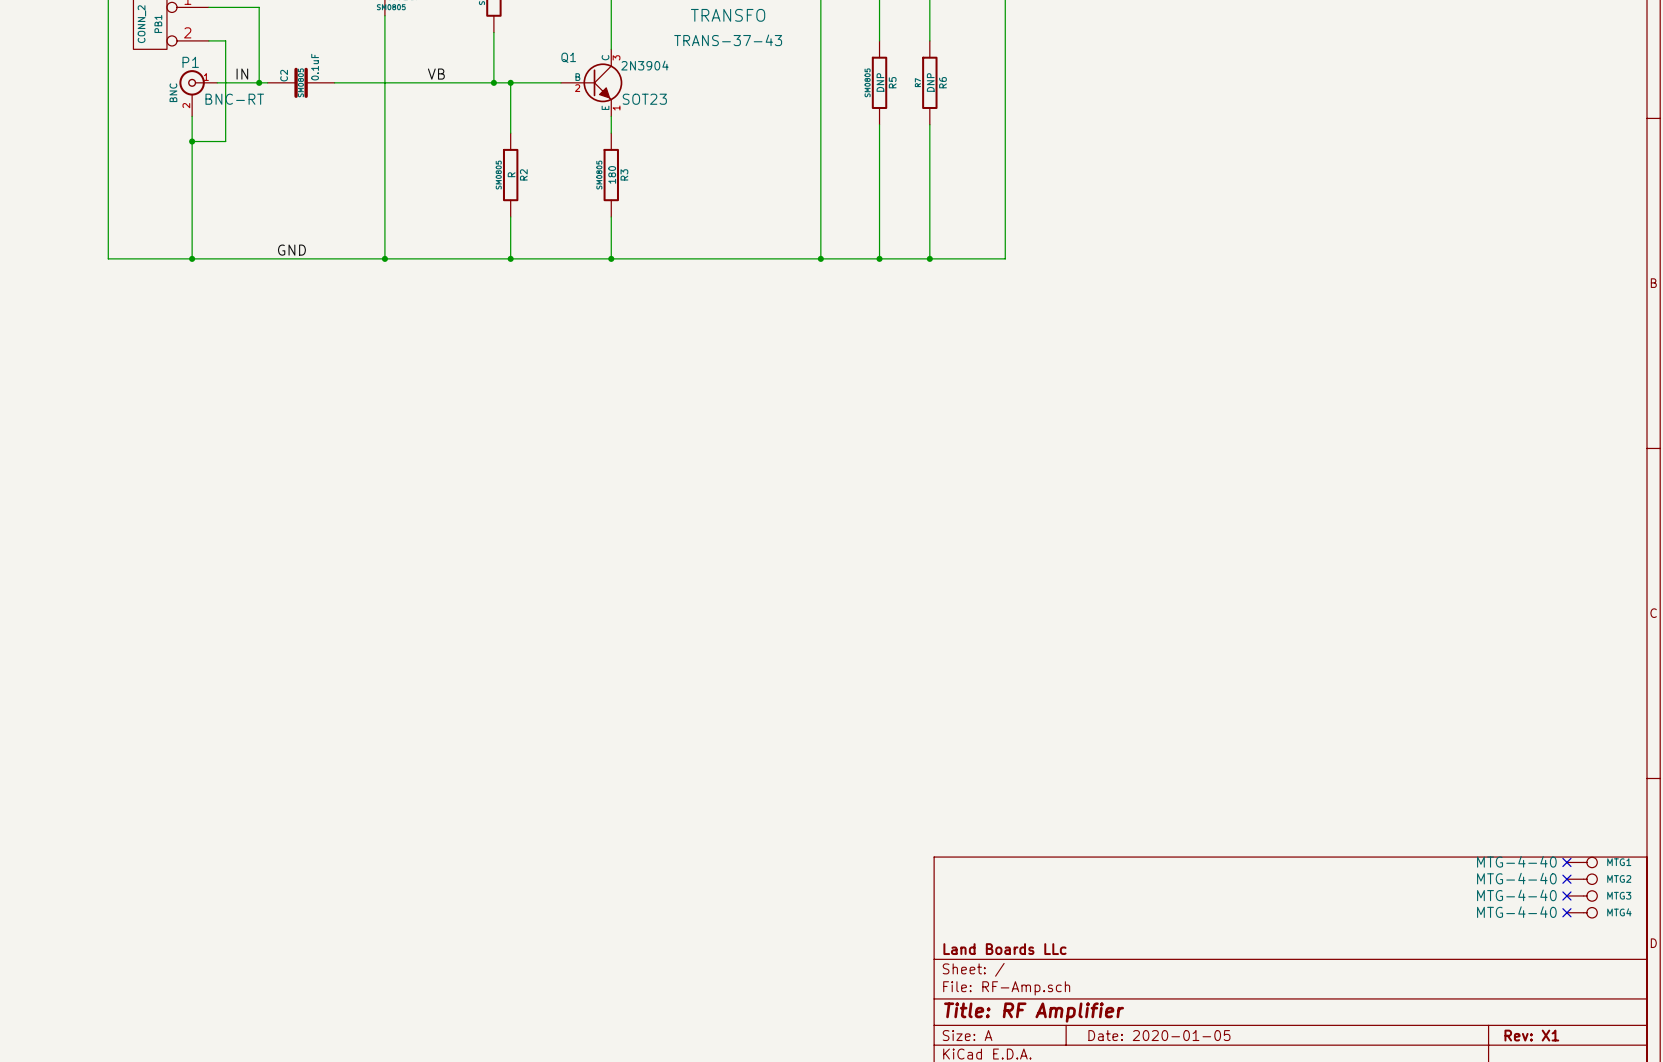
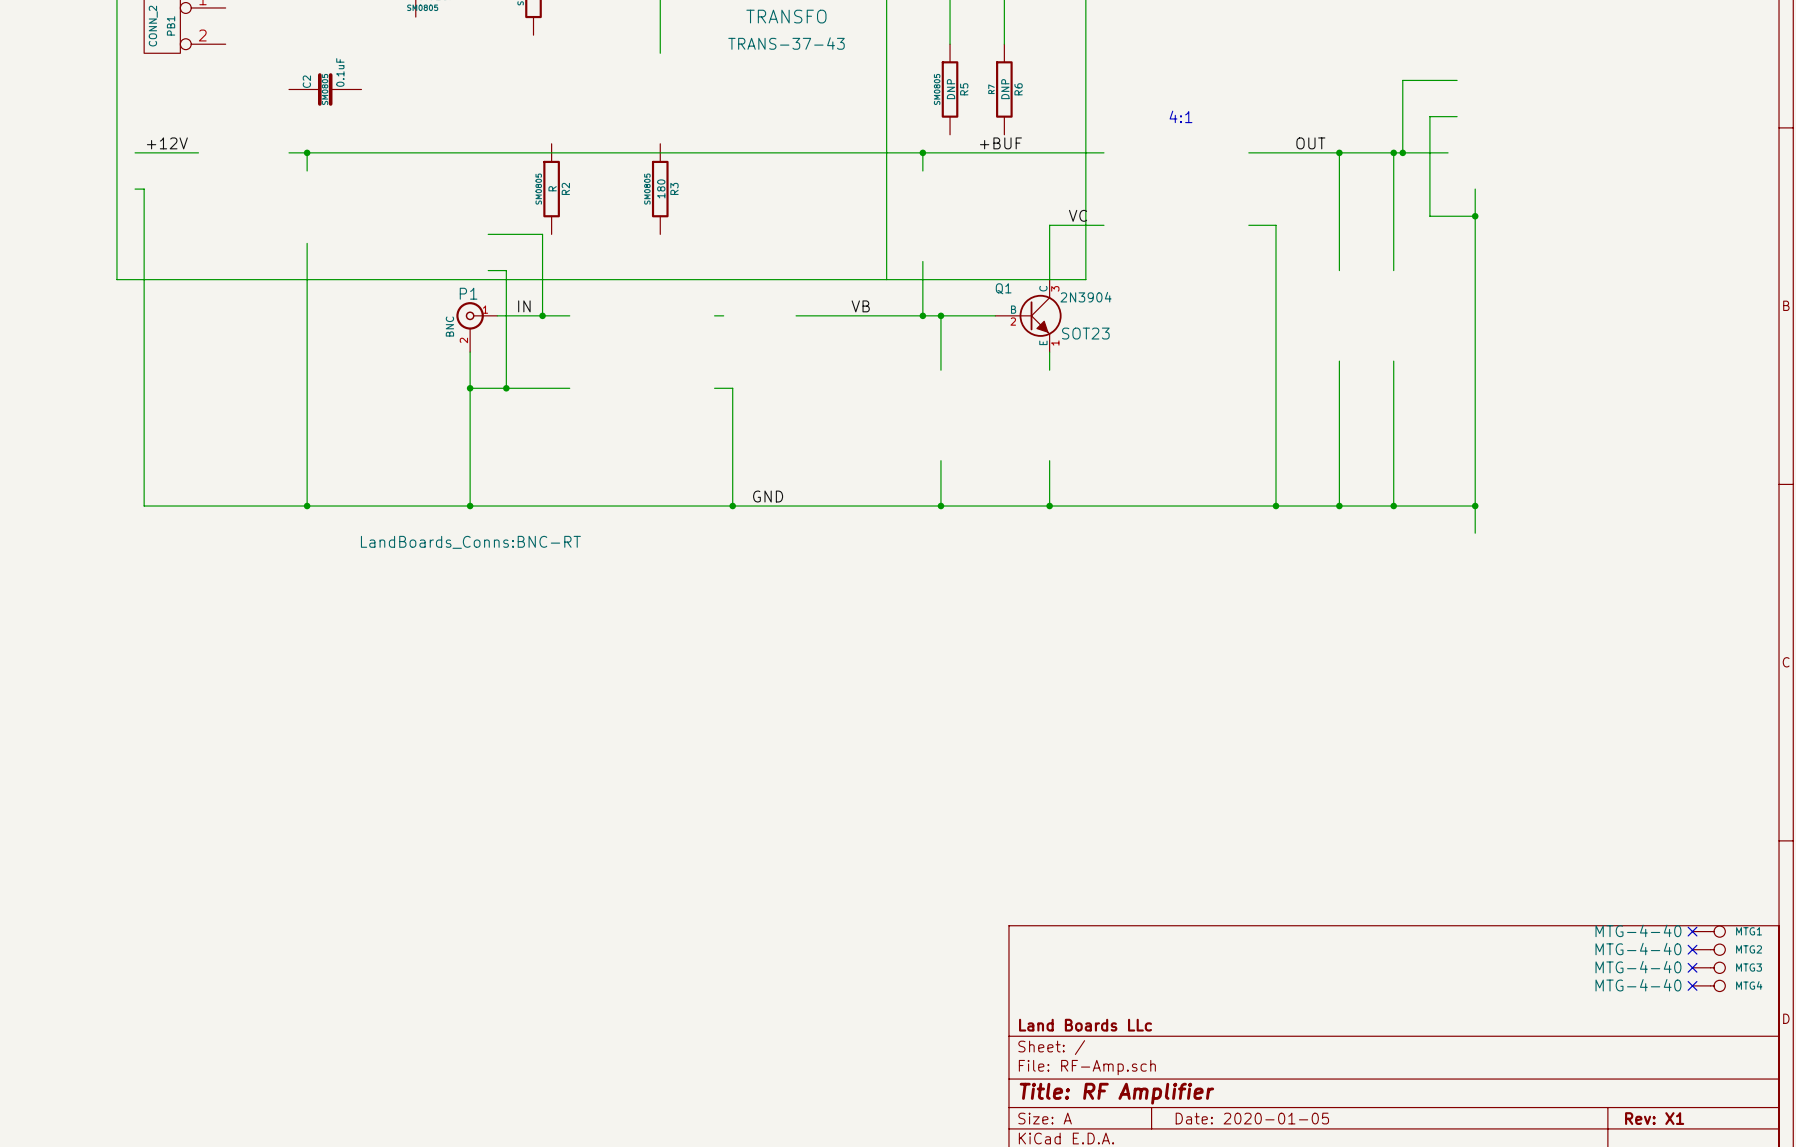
wire: (208, 7) (259, 7) (259, 82) -> none
wire: (384, 15) (384, 258) -> none
wire: (493, 32) (493, 82) -> none
wire: (208, 40) (225, 40) (225, 141) (192, 141) -> none
label: IN (242, 74) -> none
label: VB (436, 74) -> none
wire: none -> (1457, 80) (1402, 80) (1402, 152)
wire: (217, 82) (267, 82) -> none
junction: (259, 82) -> none
wire: (334, 82) (560, 82) -> none
junction: (493, 82) -> none
wire: (510, 82) (510, 133) -> none
junction: (510, 82) -> none
Q1 position: (591, 82) -> (1028, 315)
P1 position: (198, 93) -> (476, 327)
P1 text: BNC-RT (234, 99) -> LandBoards_Conns:BNC-RT (470, 542)
wire: none -> (1457, 116) (1429, 116) (1429, 216) (1475, 216)
text: none -> 4:1 (1180, 116)
wire: (192, 116) (192, 258) -> none
wire: (611, 116) (611, 133) -> none
wire: (879, 124) (879, 258) -> none
wire: (929, 124) (929, 258) -> none
label: none -> +12V (167, 143)
label: none -> +BUF (1000, 143)
label: none -> OUT (1310, 143)
wire: none -> (135, 152) (198, 152)
junction: (192, 141) -> none
wire: none -> (289, 152) (1103, 152)
wire: none -> (307, 152) (307, 170)
junction: none -> (307, 152)
wire: none -> (922, 152) (922, 170)
junction: none -> (922, 152)
wire: none -> (1248, 152) (1448, 152)
wire: none -> (1339, 152) (1339, 270)
junction: none -> (1339, 152)
wire: none -> (1393, 152) (1393, 270)
junction: none -> (1393, 152)
junction: none -> (1402, 152)
wire: none -> (135, 189) (144, 189) (144, 506) (1475, 506)
wire: none -> (1475, 189) (1475, 533)
label: none -> VC (1078, 215)
junction: none -> (1475, 216)
wire: none -> (1103, 225) (1049, 225) (1049, 279)
wire: none -> (1248, 225) (1276, 225) (1276, 506)
wire: none -> (488, 234) (542, 234) (542, 315)
wire: (510, 216) (510, 258) -> none
wire: (611, 216) (611, 258) -> none
wire: none -> (307, 243) (307, 506)
wire: none -> (922, 261) (922, 315)
label: GND (291, 250) -> none
wire: none -> (488, 270) (506, 270) (506, 388)
junction: (192, 258) -> none
junction: (384, 258) -> none
junction position: (510, 258) -> (542, 315)
junction: (611, 258) -> none
junction: (820, 258) -> none
junction: (879, 258) -> none
junction: (929, 258) -> none
label: none -> IN (524, 306)
label: none -> VB (860, 306)
wire: none -> (497, 315) (569, 315)
wire: none -> (714, 315) (723, 315)
wire: none -> (796, 315) (995, 315)
junction: none -> (922, 315)
wire: none -> (940, 315) (940, 370)
junction: none -> (940, 315)
wire: none -> (470, 352) (470, 506)
wire: none -> (1049, 352) (1049, 370)
wire: none -> (1339, 361) (1339, 506)
wire: none -> (1393, 361) (1393, 506)
wire: none -> (470, 388) (569, 388)
junction: none -> (470, 388)
junction: none -> (506, 388)
wire: none -> (714, 388) (732, 388) (732, 506)
wire: none -> (940, 460) (940, 506)
wire: none -> (1049, 460) (1049, 506)
label: none -> GND (768, 496)
junction: none -> (307, 506)
junction: none -> (470, 506)
junction: none -> (732, 506)
junction: none -> (940, 506)
junction: none -> (1049, 506)
junction: none -> (1276, 506)
junction: none -> (1339, 506)
junction: none -> (1393, 506)
junction: none -> (1475, 506)

